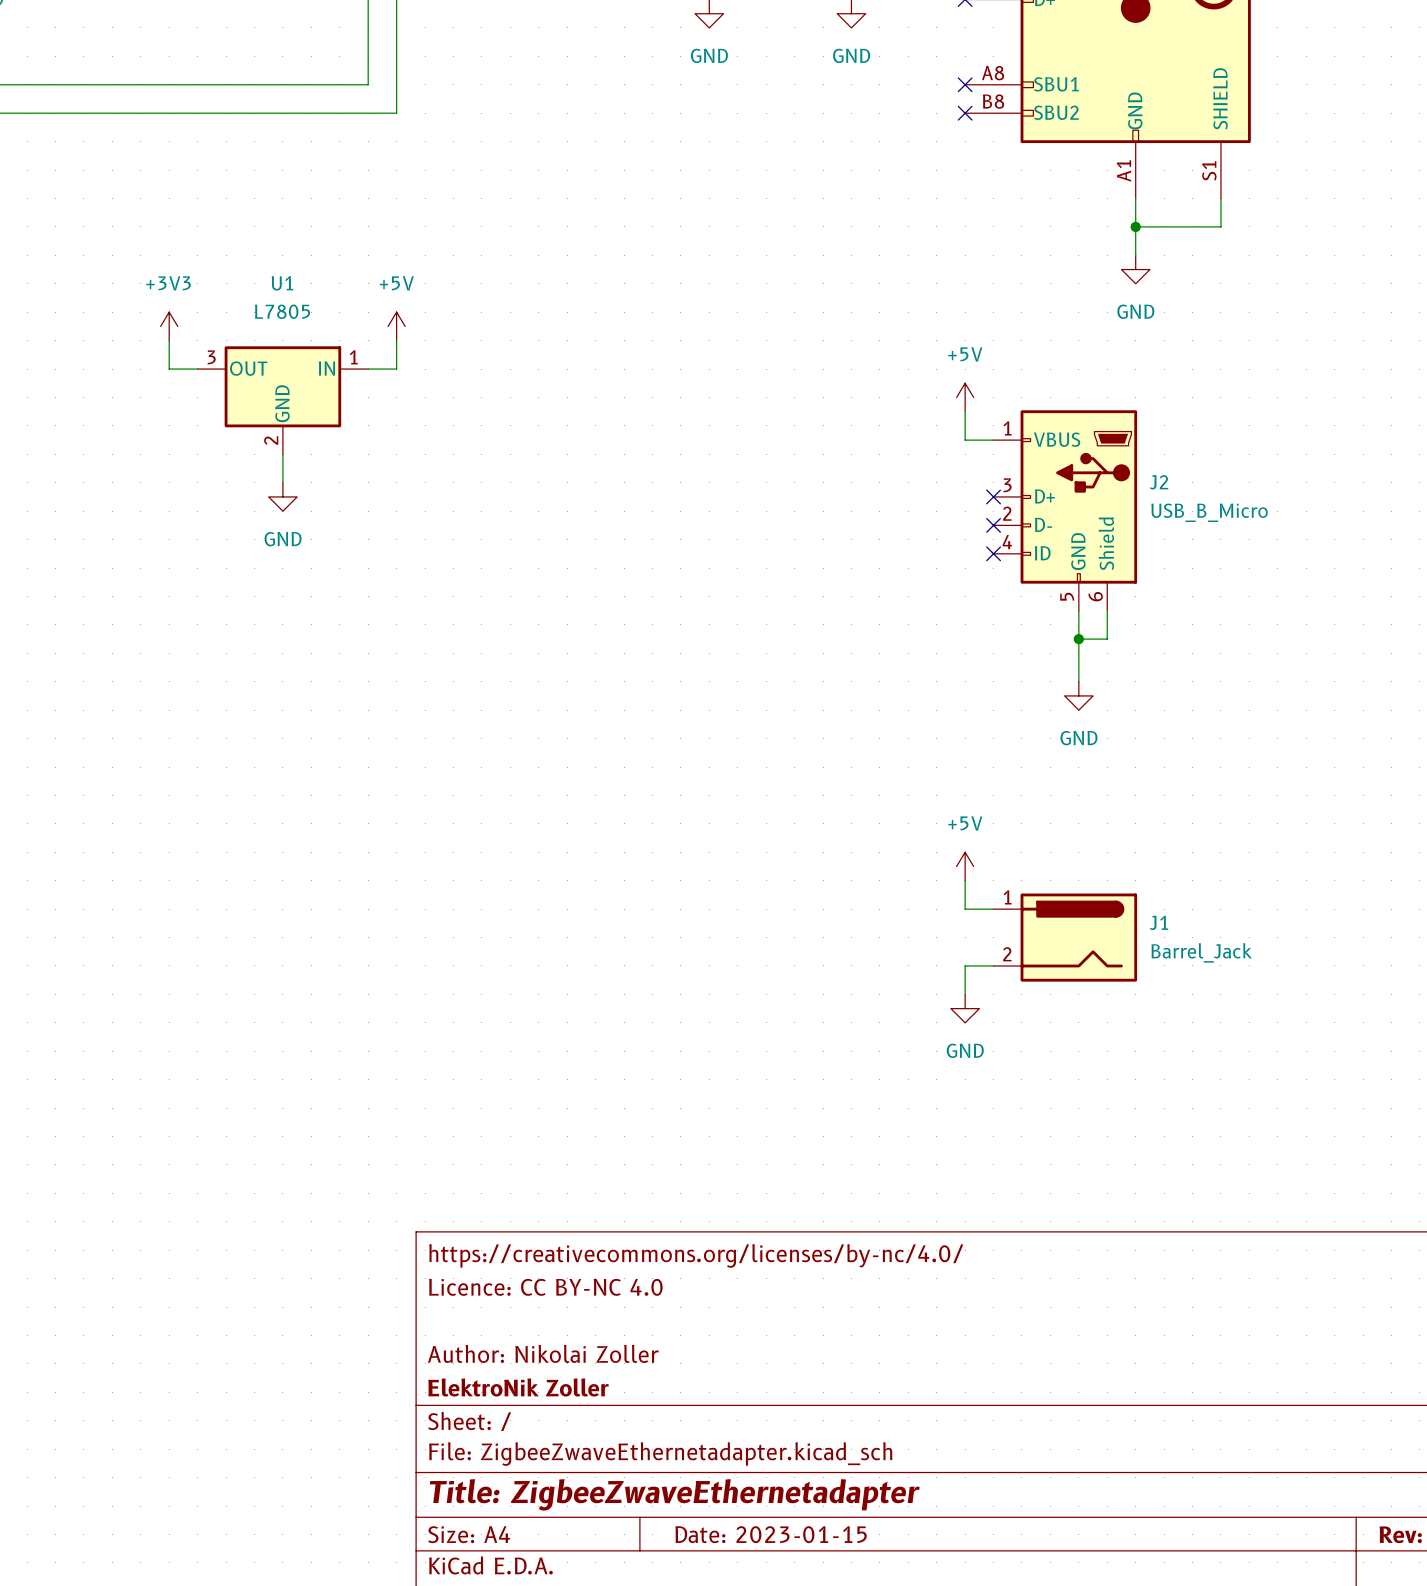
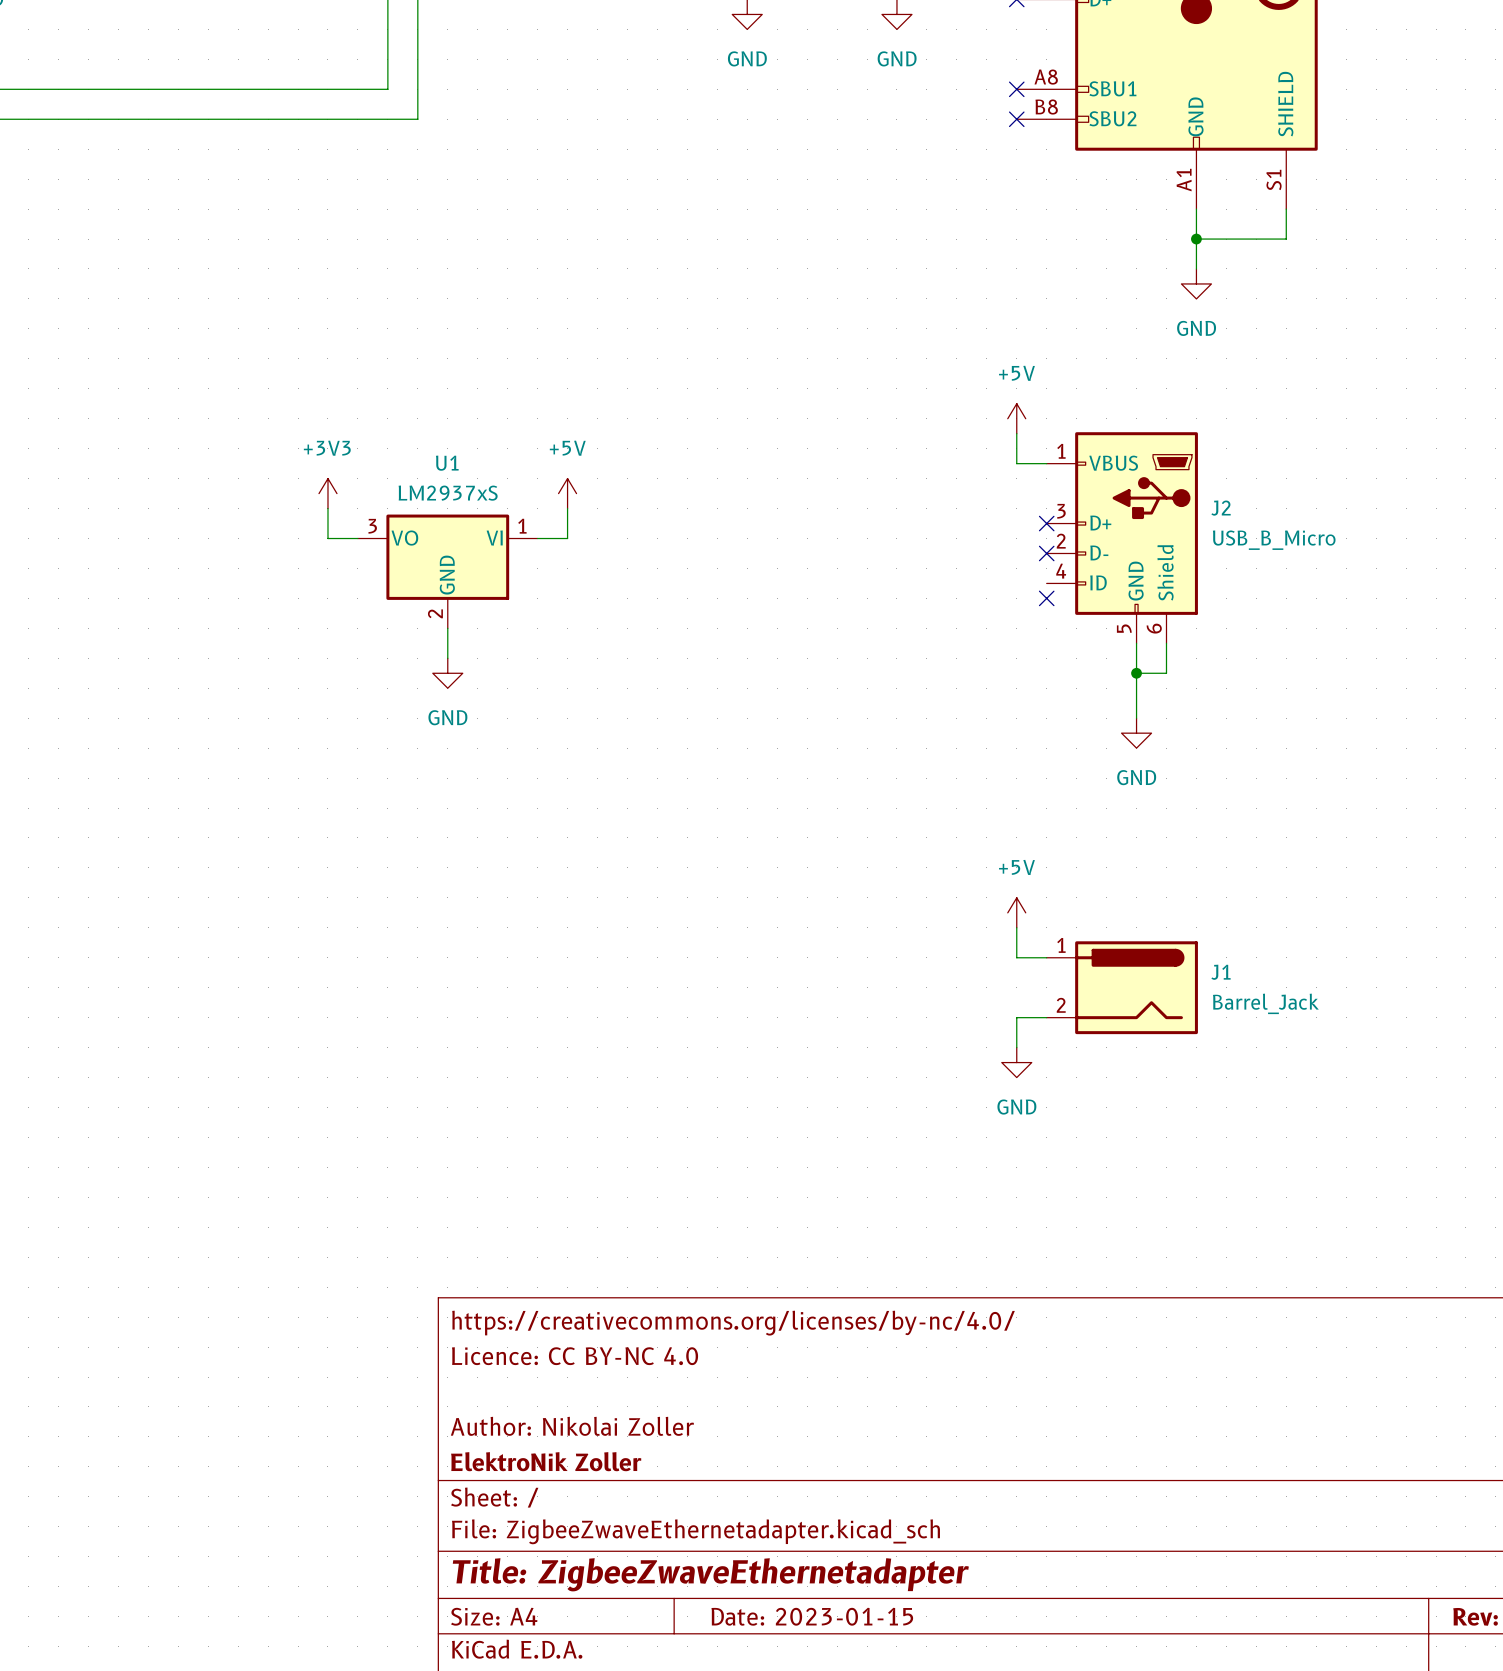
U1 name position: U1 (282, 283) -> U1 (447, 463)
U1 value: L7805 (282, 311) -> LM2937xS (448, 493)
power symbol position: +3V3 (169, 326) -> +3V3 (327, 493)
power symbol position: +5V (396, 326) -> +5V (567, 493)
wire: (169, 340) (169, 369) (197, 369) -> (327, 508) (327, 538) (357, 538)
wire: (396, 340) (396, 369) (368, 369) -> (567, 508) (567, 538) (537, 538)
U1 pin name: OUT (248, 368) -> VO (404, 538)
U1 pin name: IN (326, 368) -> VI (494, 538)
U1 position: (282, 400) -> (447, 571)
wire: (282, 454) (282, 482) -> (447, 628) (447, 658)
power symbol position: GND (282, 496) -> GND (447, 673)
no-connect mark position: (993, 553) -> (1046, 598)

